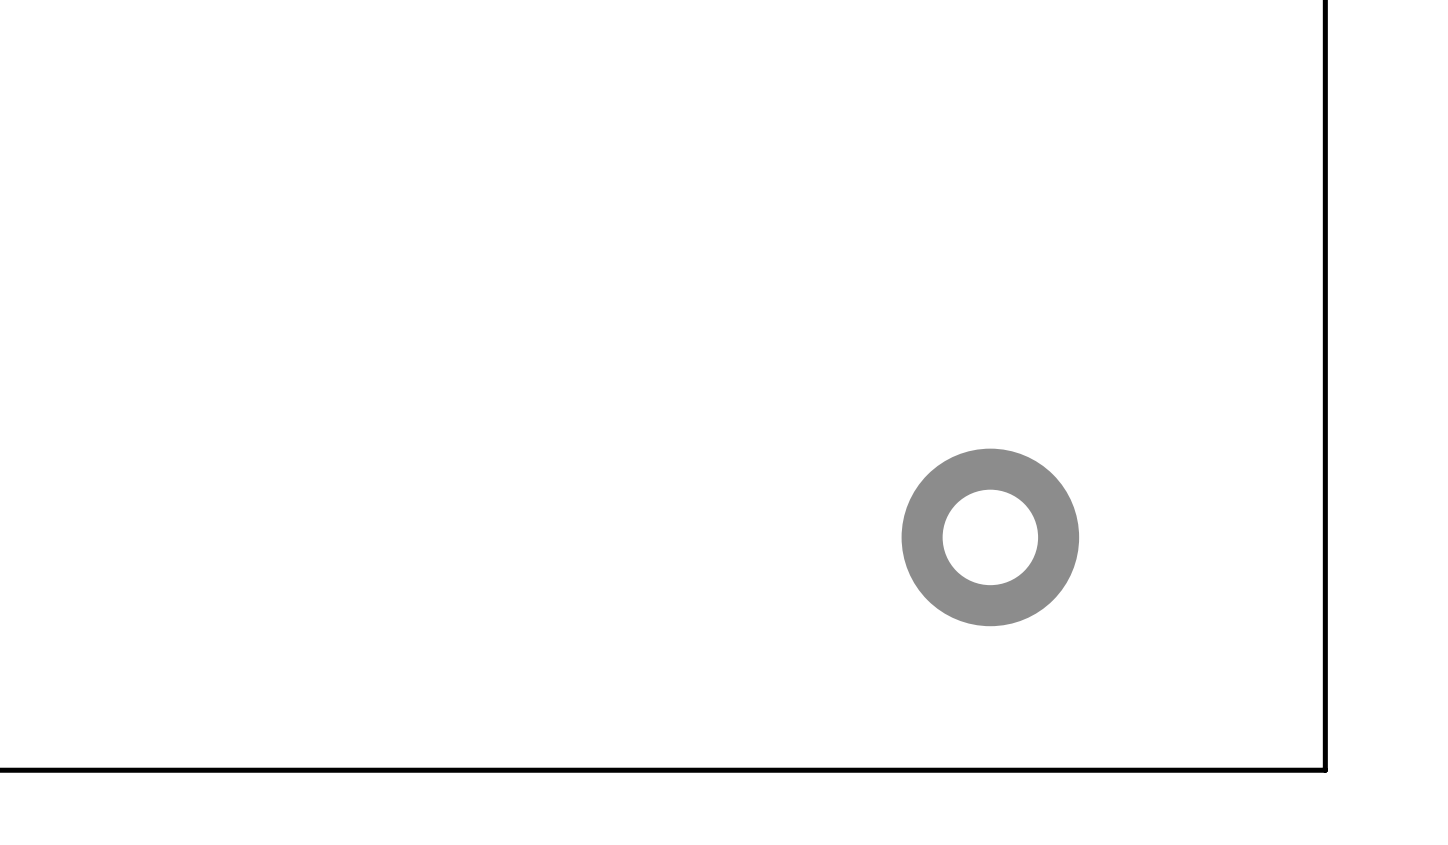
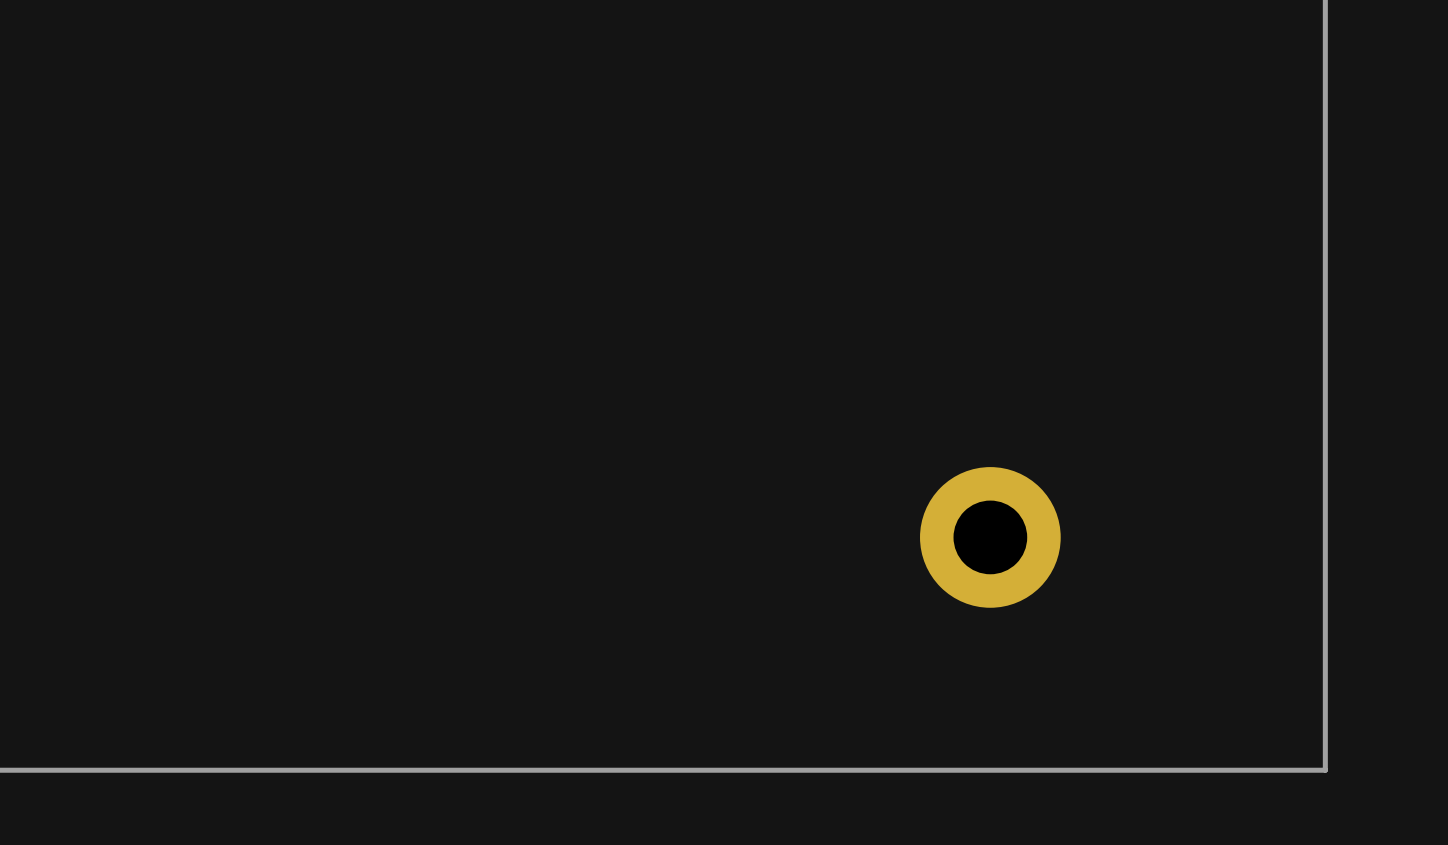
part footprint: [901, 448, 1080, 627] -> [920, 467, 1061, 608]

